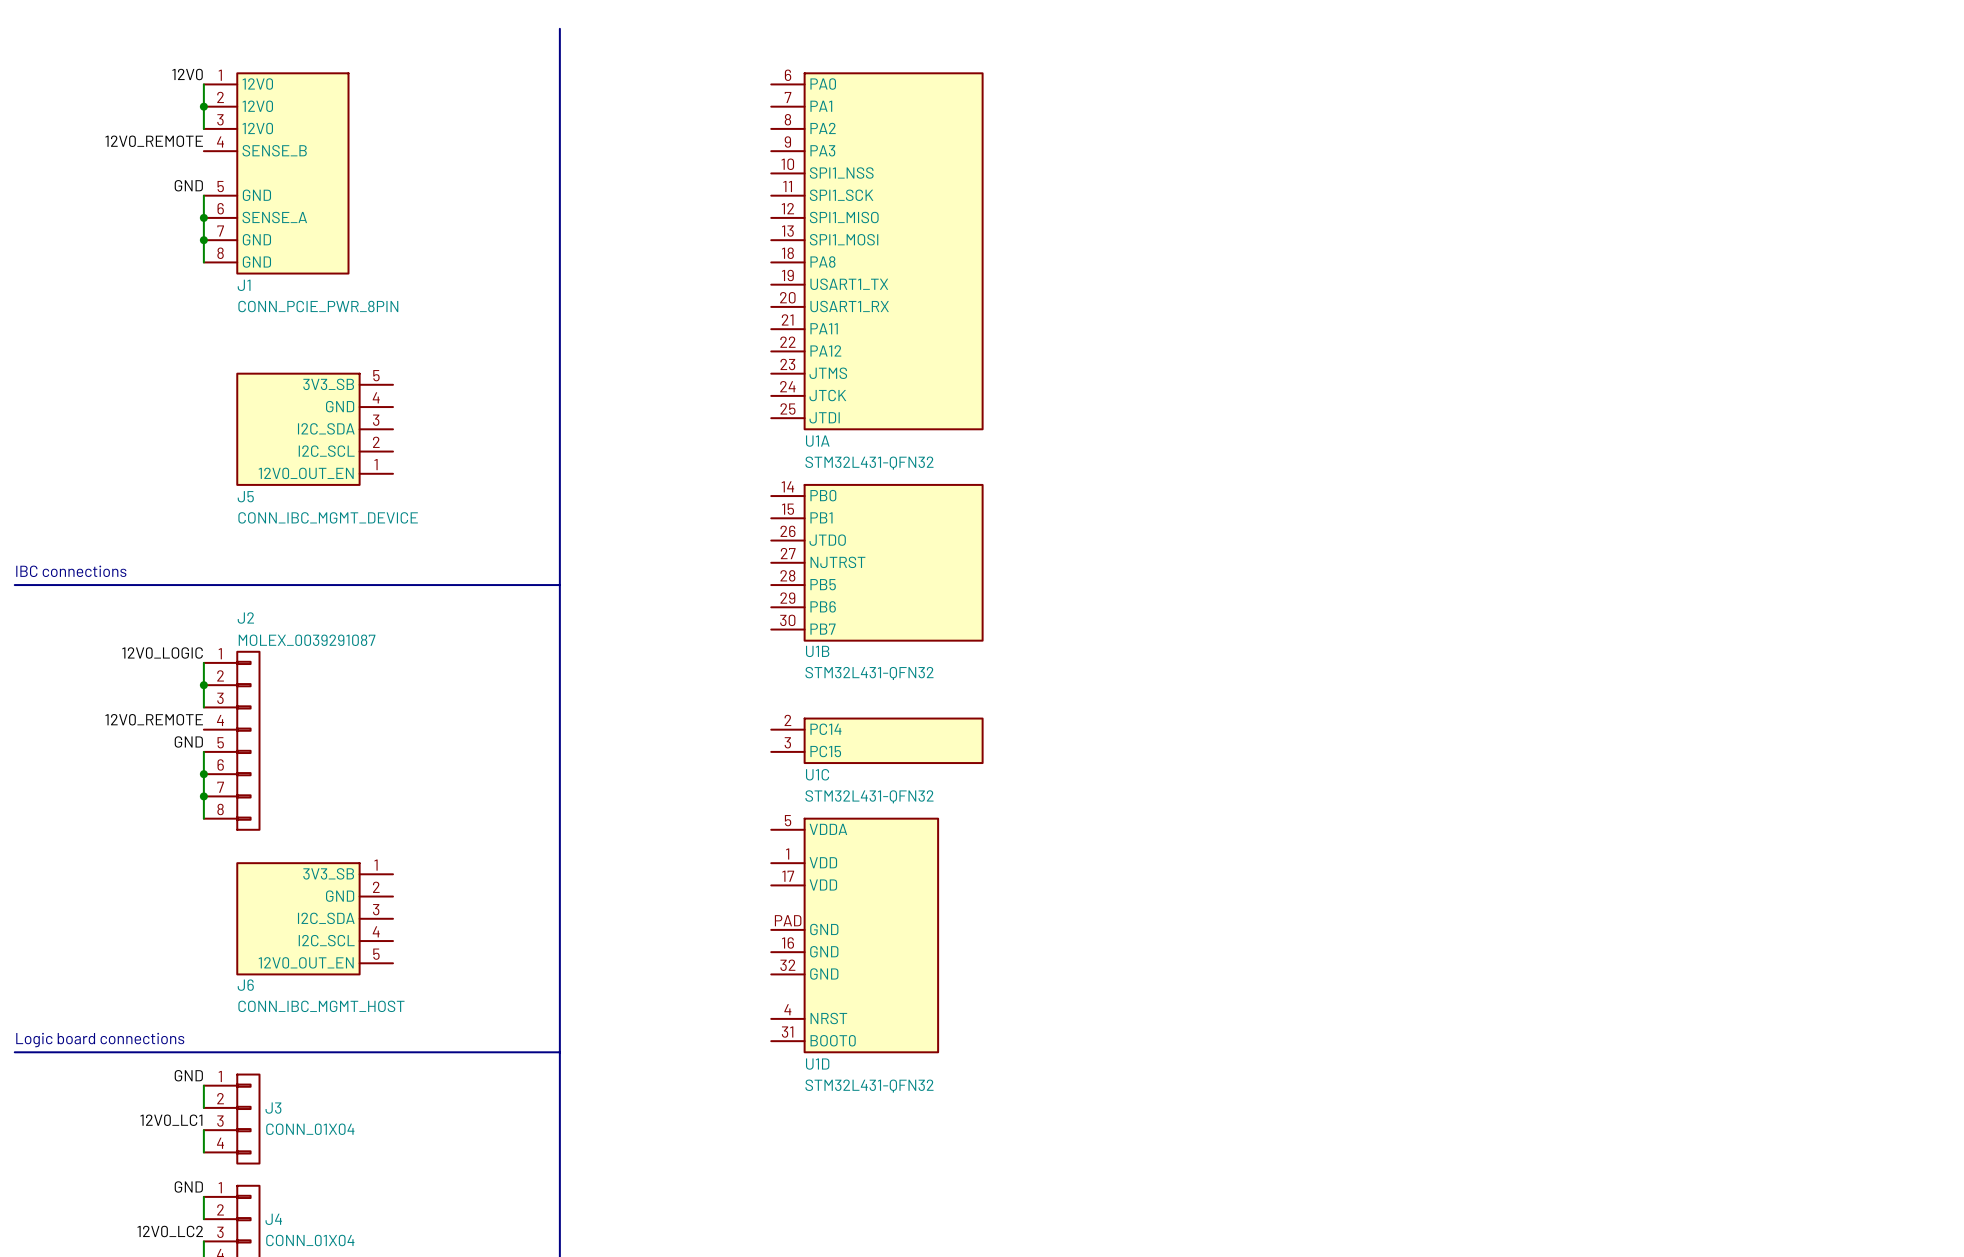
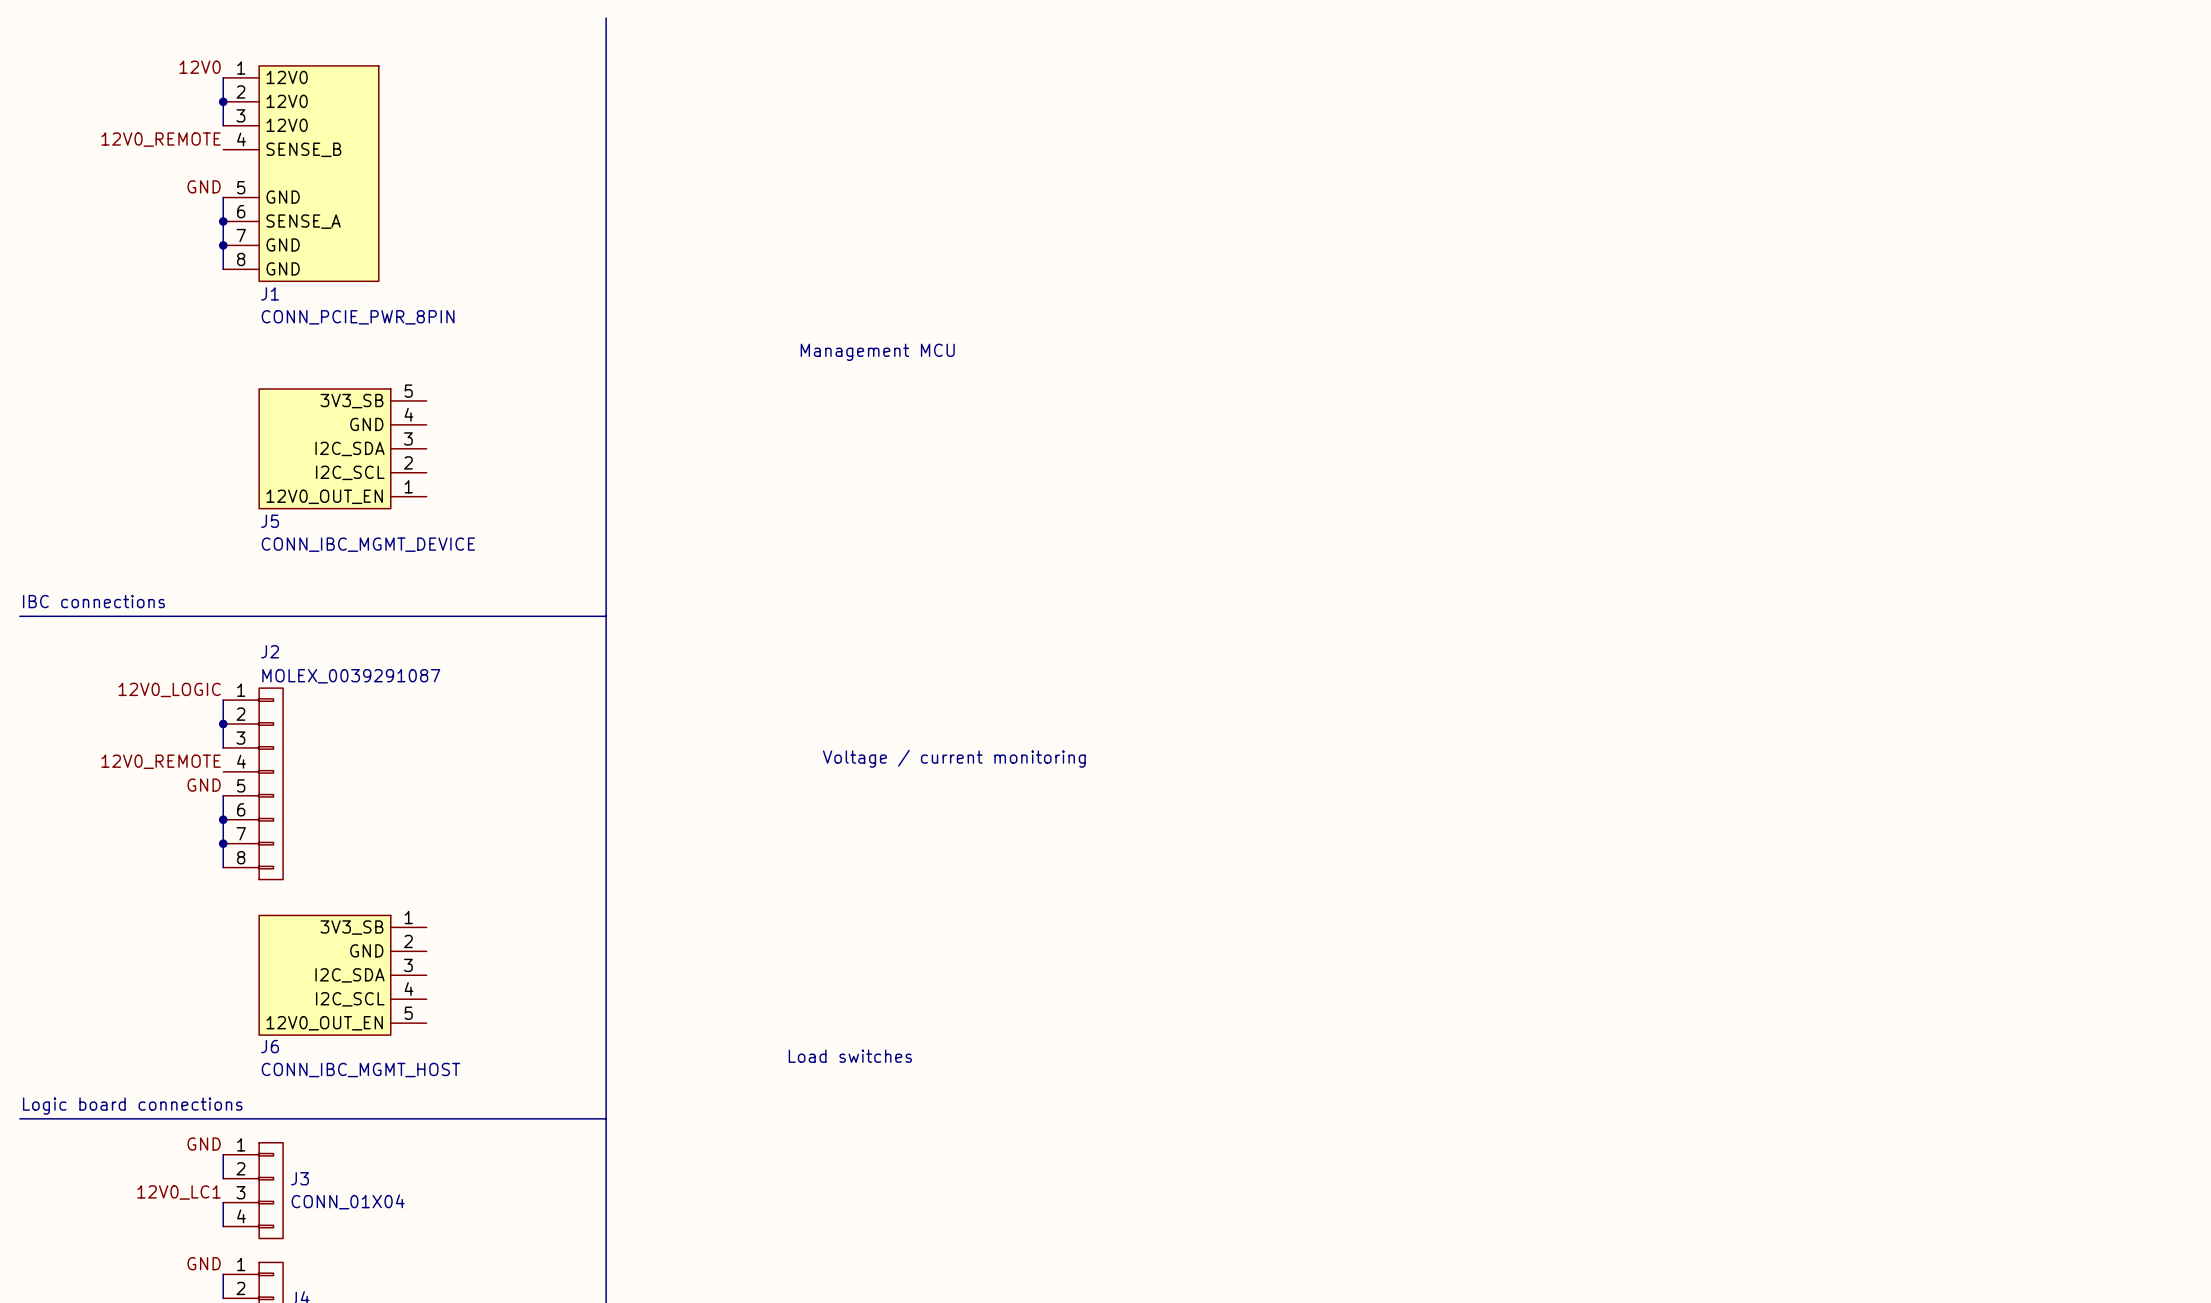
U1A: STM32L431-QFN32 (877, 251) -> none
text: none -> Management MCU (877, 352)
U1B: STM32L431-QFN32 (877, 562) -> none
text: none -> Voltage / current monitoring (954, 758)
U1C: STM32L431-QFN32 (877, 740) -> none
U1D: STM32L431-QFN32 (855, 935) -> none
text: none -> Load switches (850, 1056)

